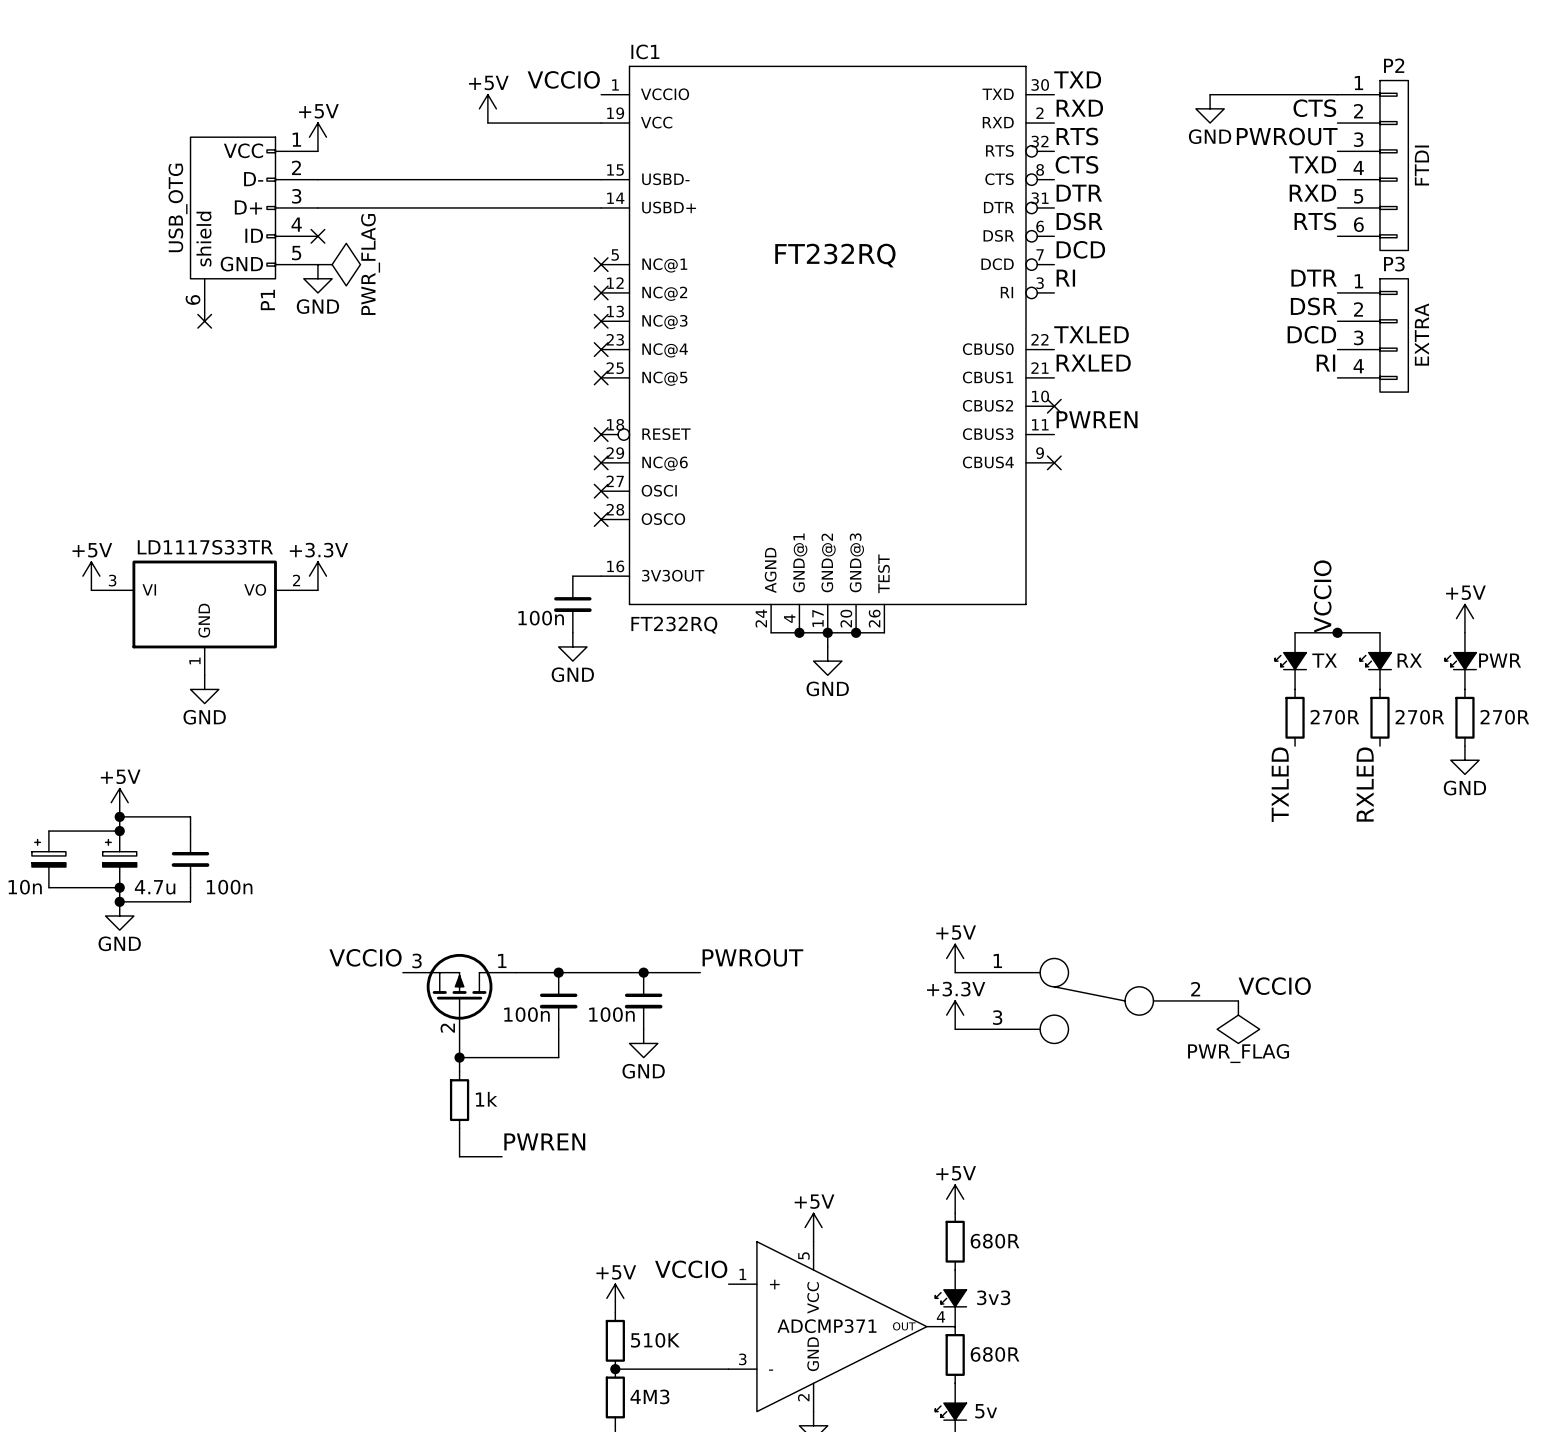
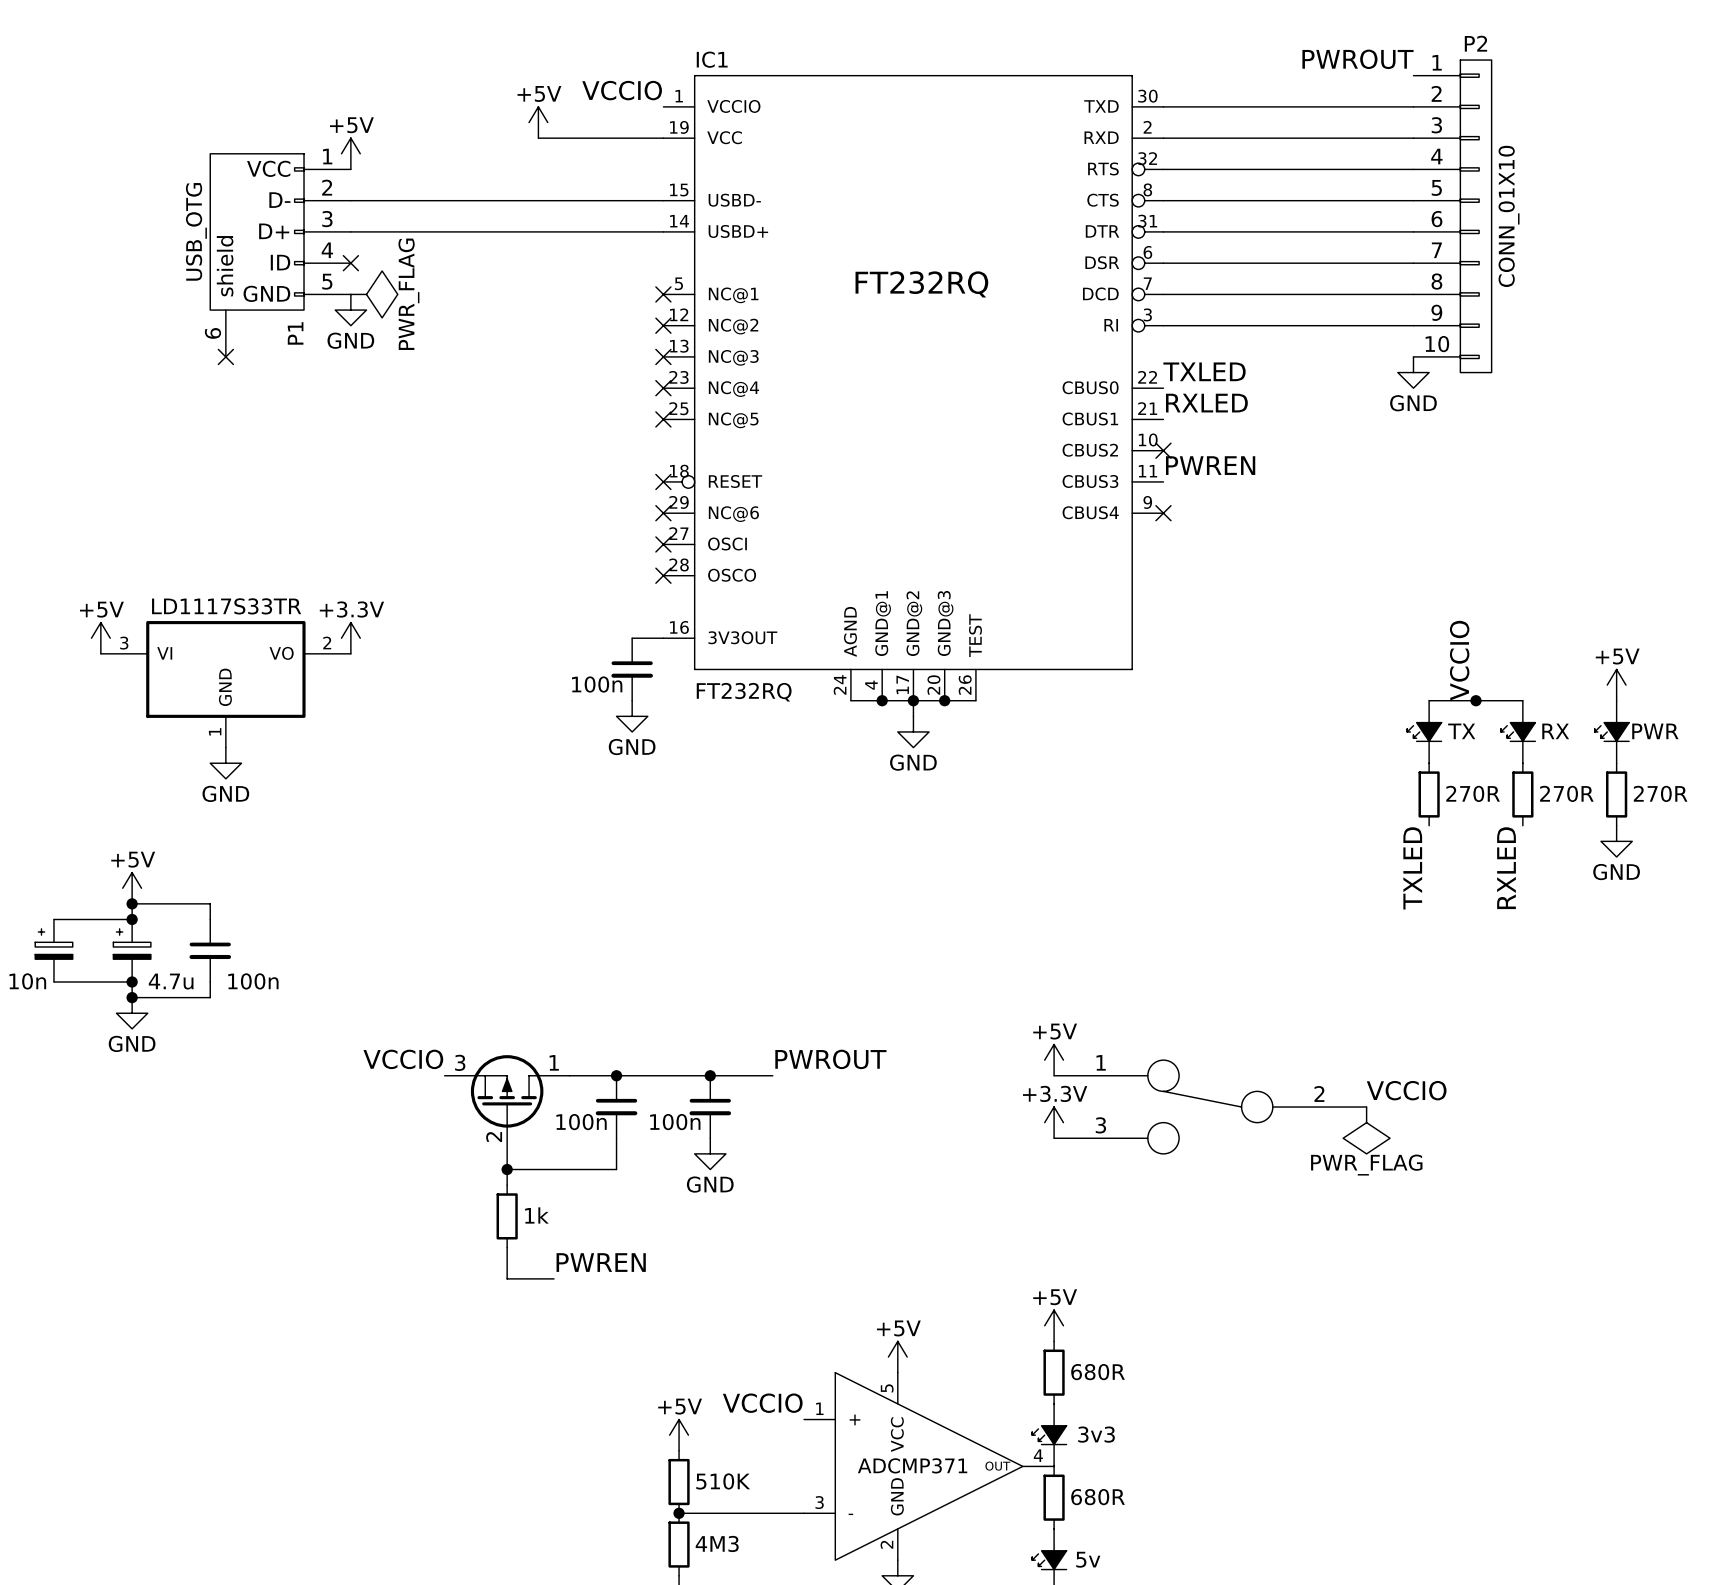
P2 name position: P2 (1394, 65) -> P2 (1475, 43)
label: TXD (1077, 79) -> none
P2 symbol: [1337, 80, 1409, 251] -> [1413, 60, 1492, 373]
wire: none -> (1163, 106) (1335, 106)
label: RXD (1079, 108) -> none
power symbol position: GND (1210, 108) -> GND (1413, 372)
label: CTS (1314, 108) -> none
wire: none -> (1163, 138) (1413, 138)
label: RTS (1077, 136) -> none
label position: PWROUT (1287, 136) -> PWROUT (1357, 59)
wire: none -> (1163, 169) (1413, 169)
label: CTS (1076, 164) -> none
label: TXD (1312, 164) -> none
P2 value: FTDI (1421, 165) -> CONN_01X10 (1509, 216)
wire: none -> (1163, 200) (1413, 200)
label: DTR (1079, 193) -> none
label: RXD (1312, 193) -> none
wire: none -> (1163, 231) (1413, 231)
label: DSR (1079, 221) -> none
label: RTS (1315, 221) -> none
wire: none -> (1163, 263) (1413, 263)
label: DCD (1080, 249) -> none
wire: none -> (1163, 294) (1413, 294)
label: RI (1065, 278) -> none
label: DTR (1314, 278) -> none
wire: none -> (1163, 325) (1413, 325)
label: DSR (1313, 306) -> none
label: DCD (1311, 334) -> none
P3: EXTRA (1372, 335) -> none
label: RI (1325, 363) -> none

